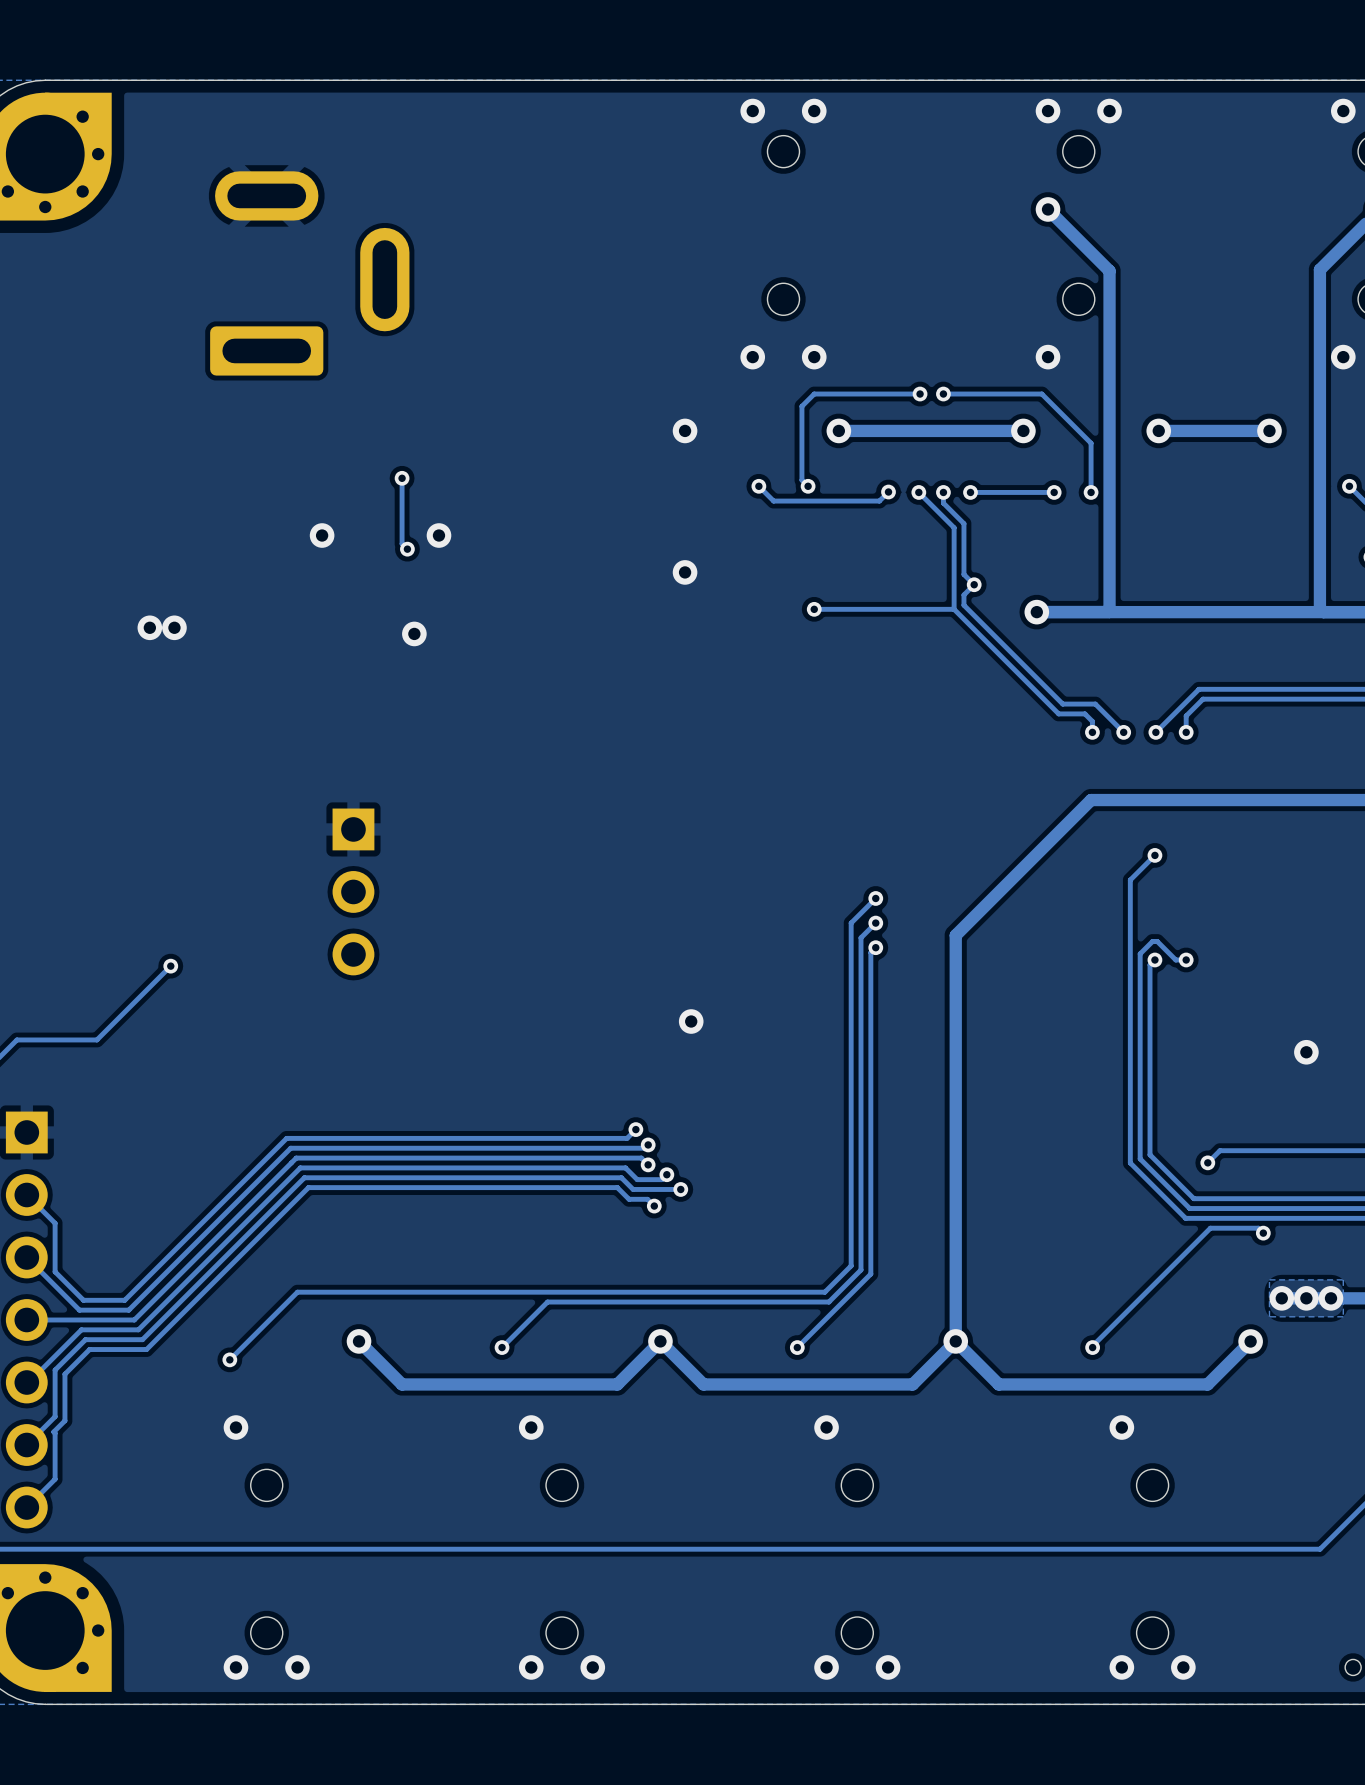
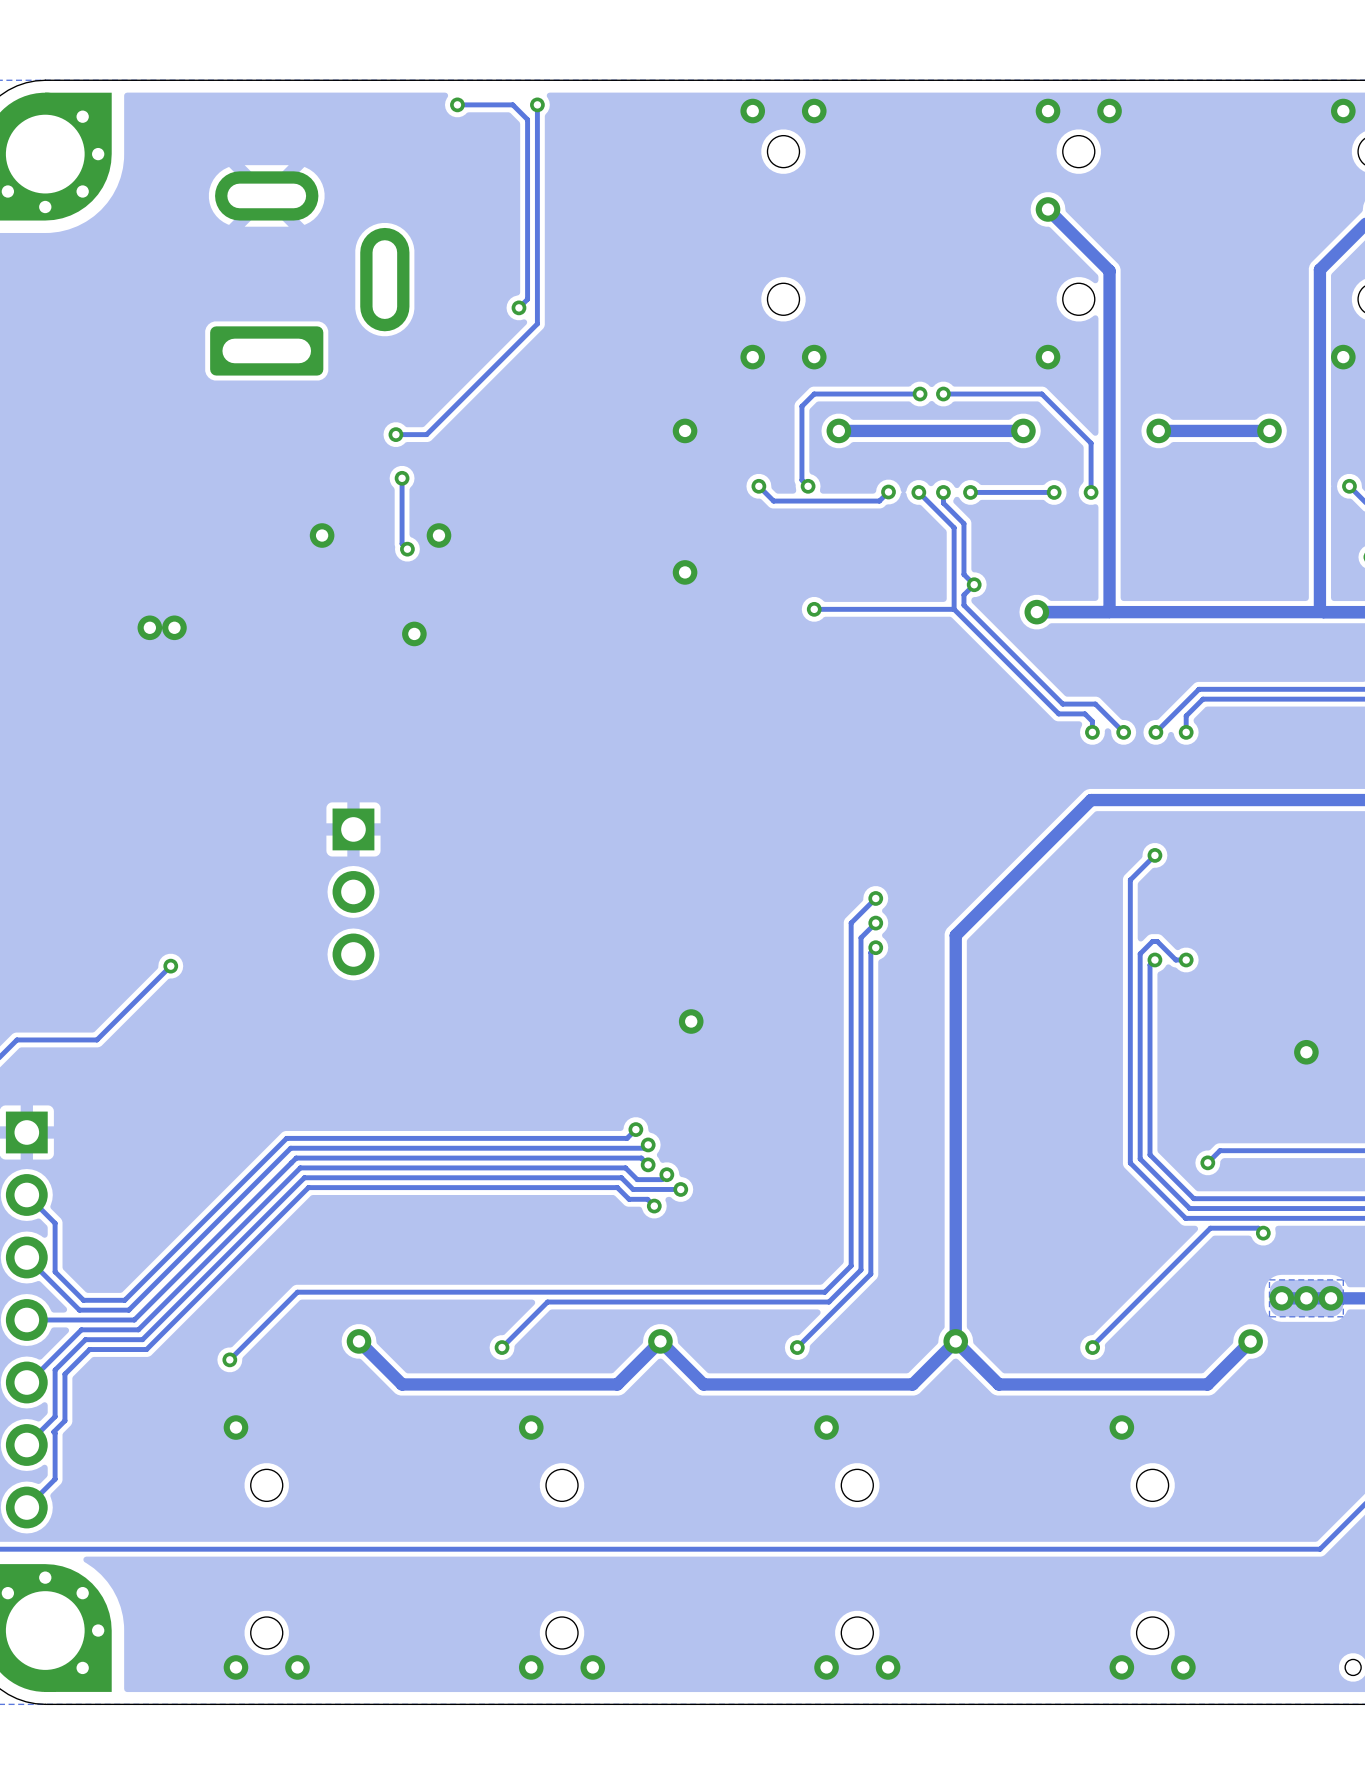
track: none -> (457, 104) (512, 104) (527, 119) (527, 299) (518, 307)
via: none -> (457, 104)
track: none -> (537, 104) (537, 323) (426, 434) (395, 434)
via: none -> (537, 104)
via: none -> (518, 307)
via: none -> (395, 434)

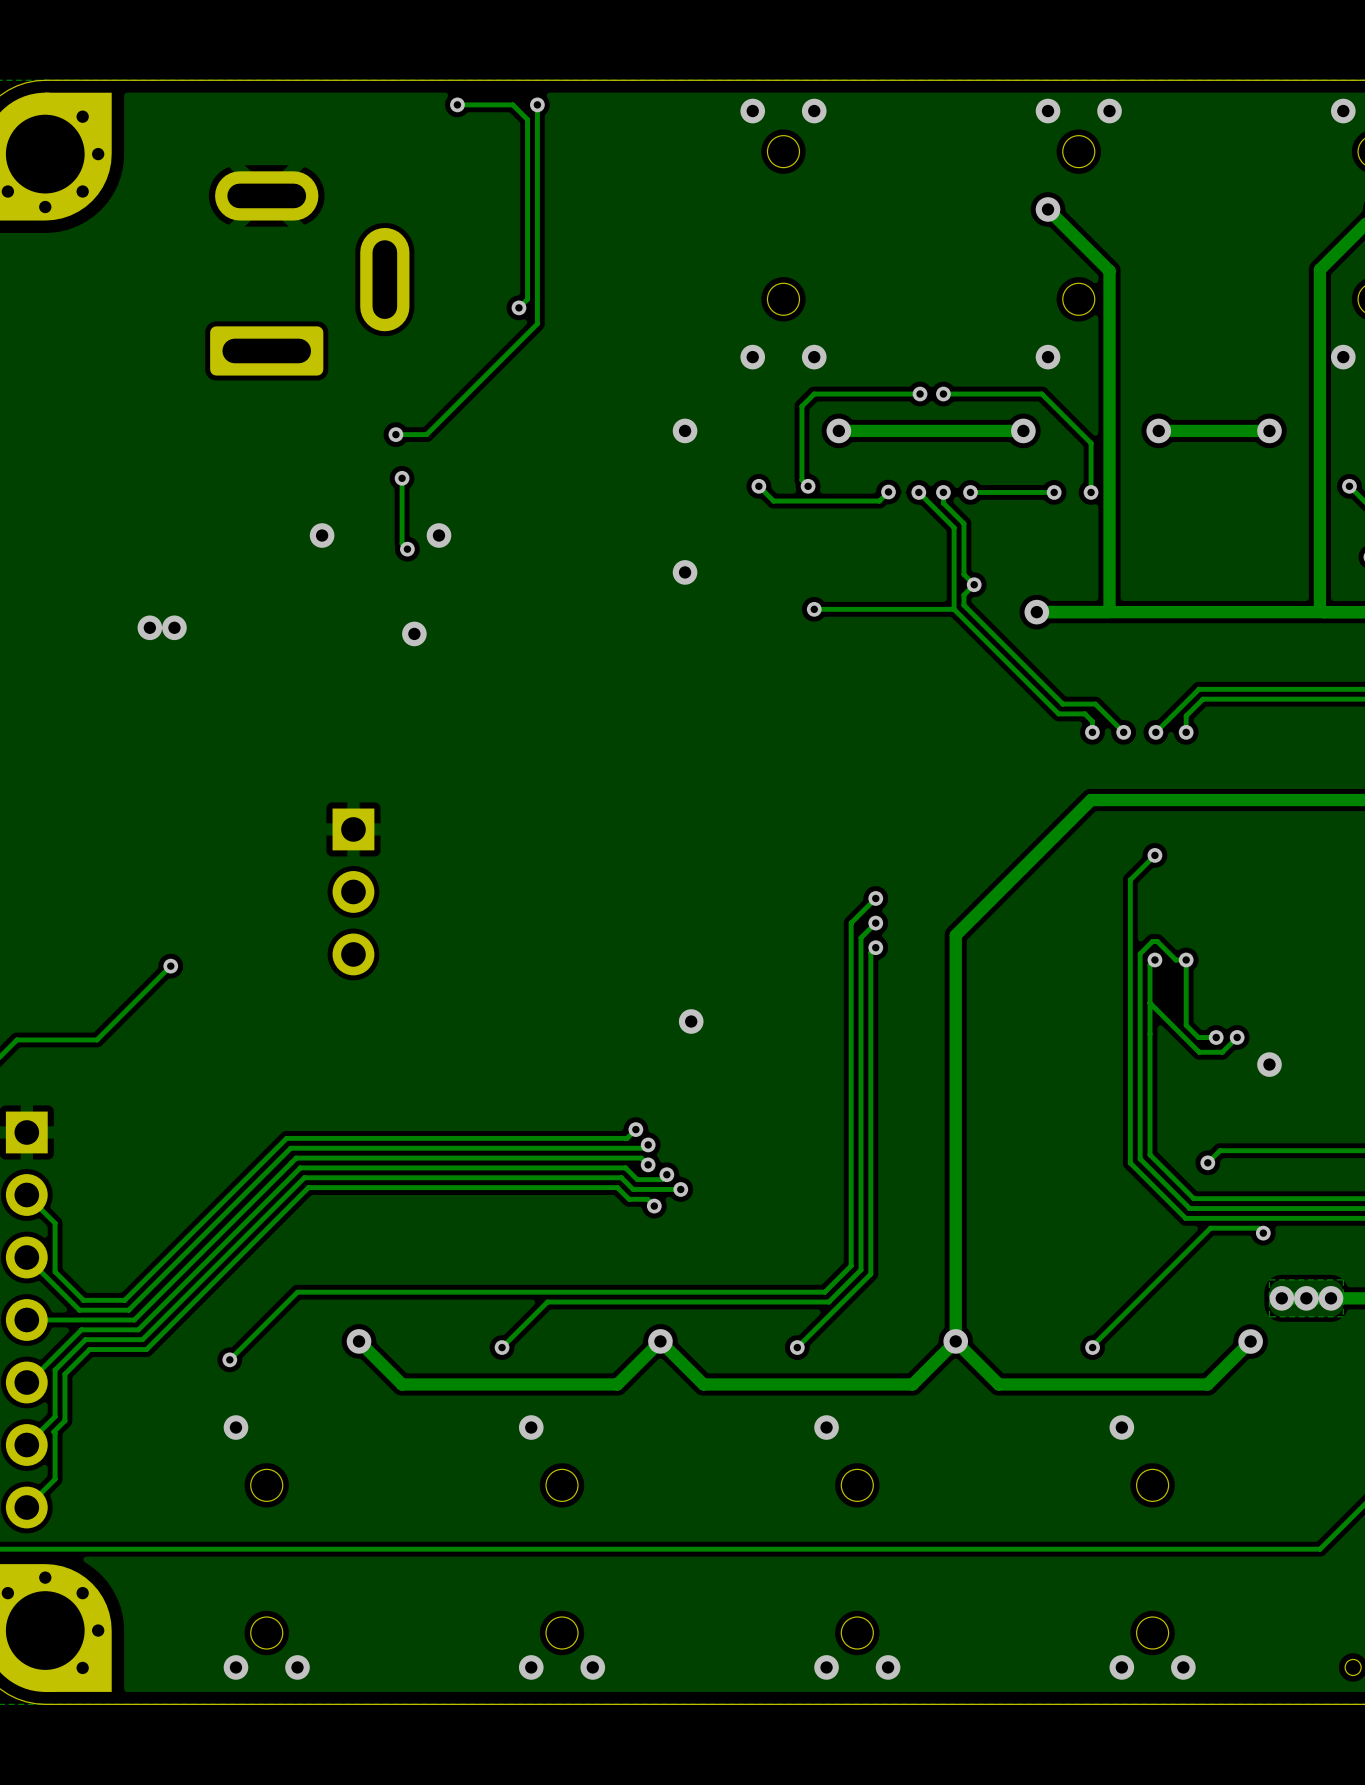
track: none -> (1186, 959) (1186, 1025) (1198, 1037) (1216, 1037)
track: none -> (1150, 1003) (1199, 1052) (1222, 1052) (1237, 1037)
via: none -> (1216, 1037)
via: none -> (1237, 1037)
via position: (1306, 1052) -> (1269, 1064)

